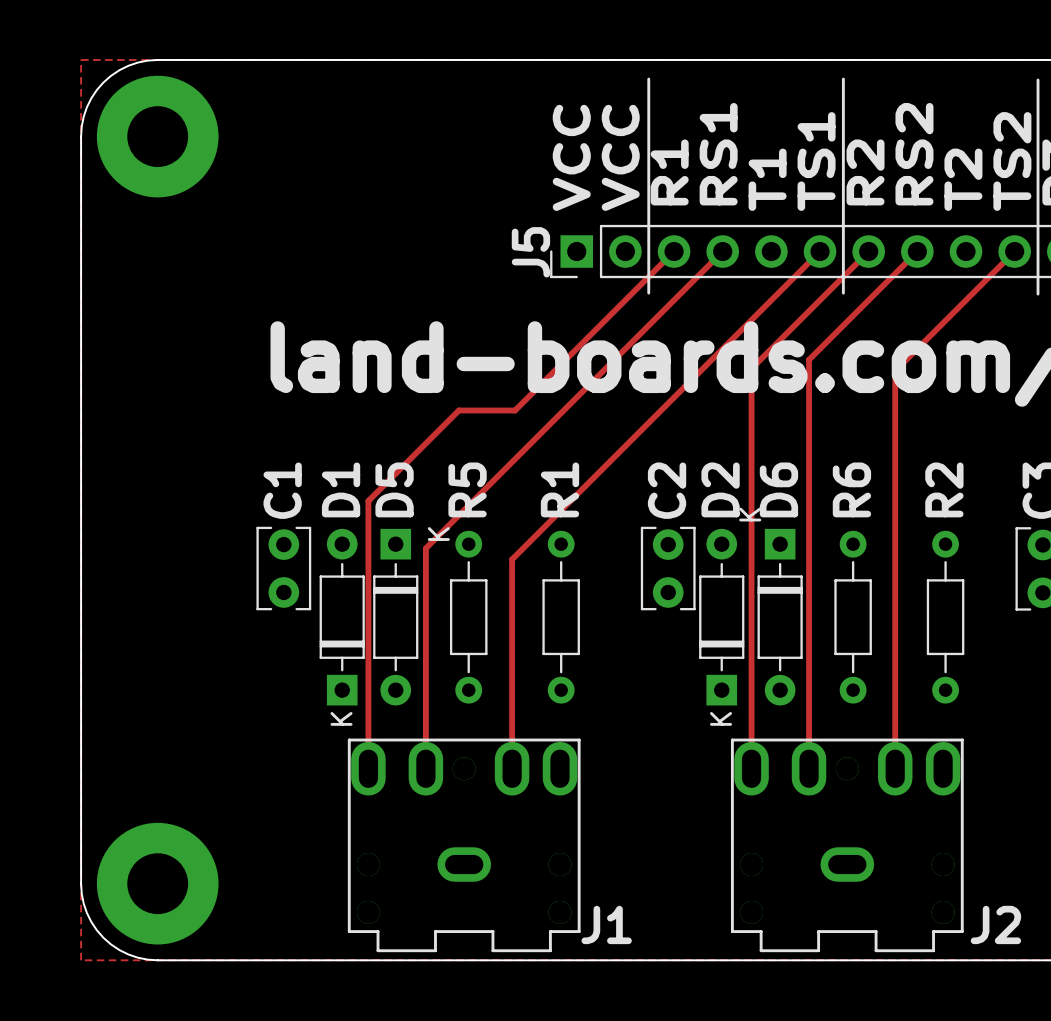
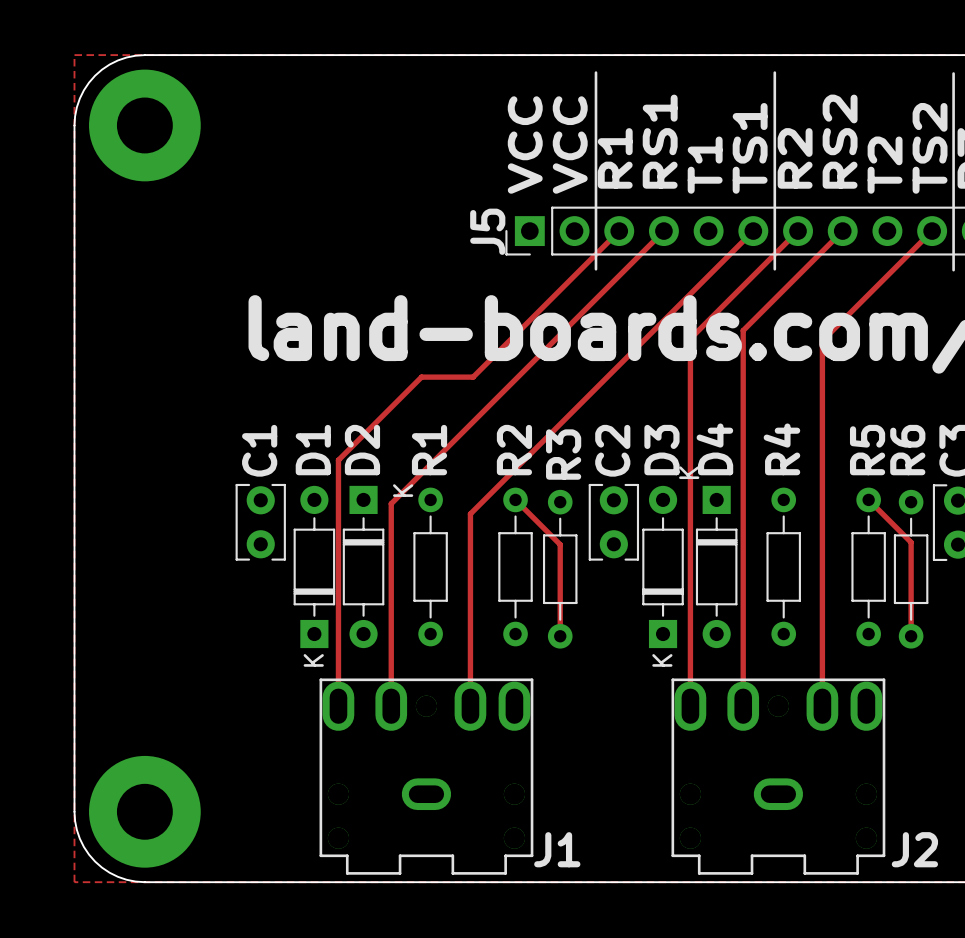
D5 name: D5 (394, 489) -> D2 (362, 450)
R5 name: R5 (467, 489) -> R1 (429, 450)
R1 name: R1 (560, 489) -> R2 (514, 450)
D2 name: D2 (720, 489) -> D3 (661, 450)
D6 name: D6 (778, 489) -> D4 (714, 449)
R6 name: R6 (851, 489) -> R4 (781, 449)
R2 name: R2 (944, 489) -> R5 (867, 450)
track: none -> (515, 499) (560, 544) (560, 636)
track: none -> (868, 499) (911, 542) (911, 636)
R3: none -> (560, 569)
R6: none -> (911, 569)

